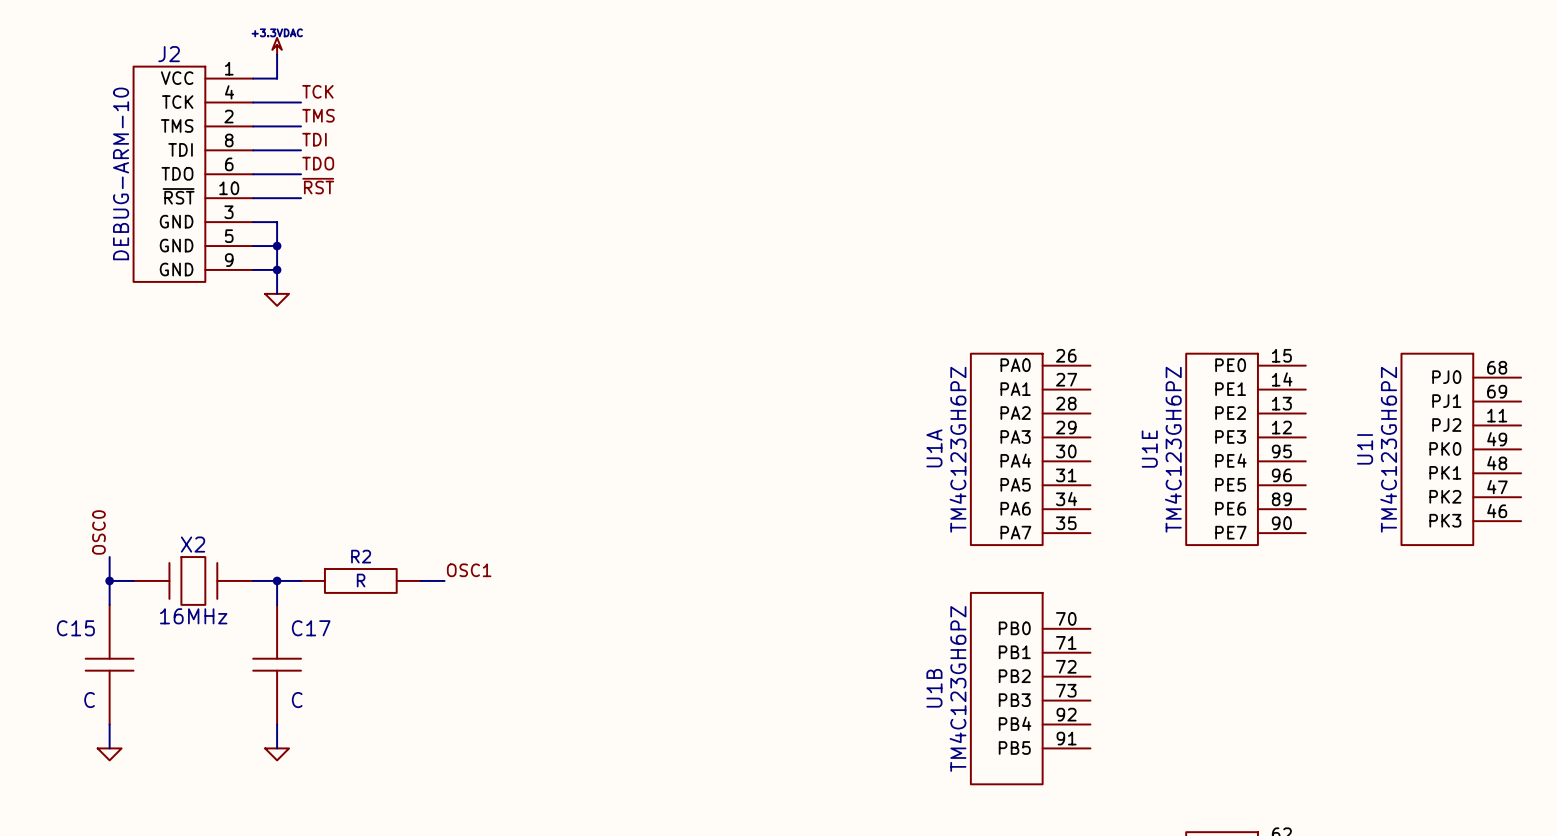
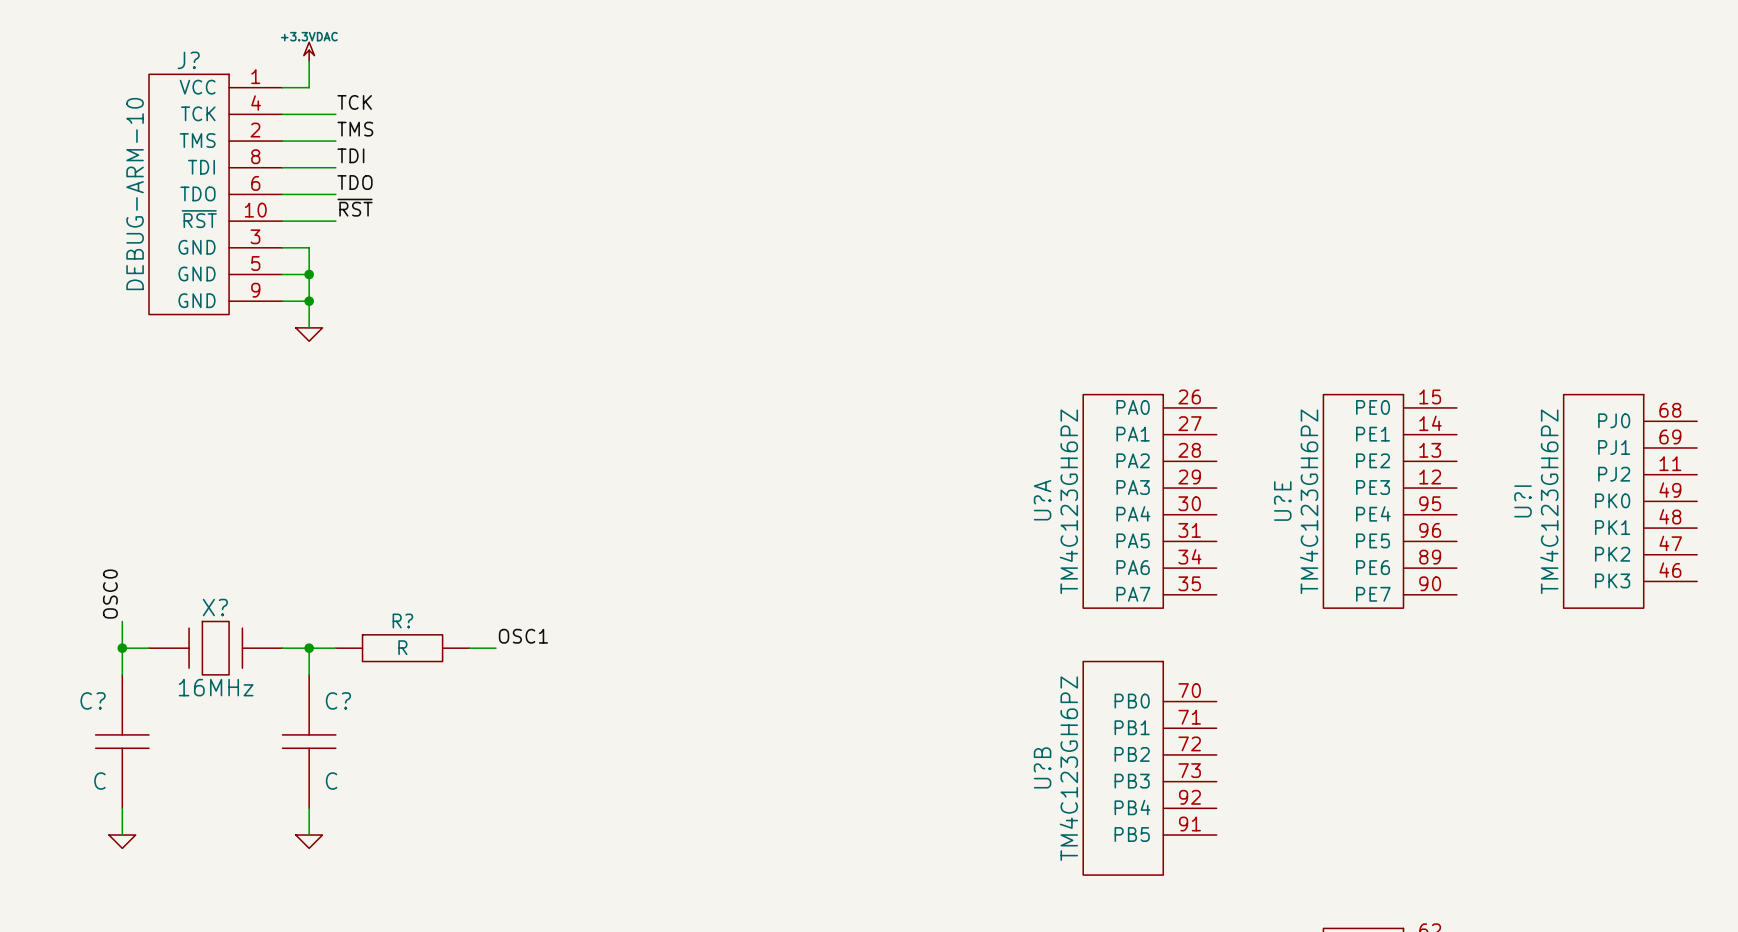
J2 name: J2 (169, 54) -> J? (188, 60)
U1A name: U1A (934, 448) -> U?A (1042, 500)
U1E name: U1E (1149, 449) -> U?E (1282, 501)
U1I name: U1I (1365, 449) -> U?I (1523, 501)
X2 name: X2 (193, 544) -> X? (215, 607)
R2 name: R2 (361, 556) -> R? (402, 620)
C15 name: C15 (75, 628) -> C? (93, 700)
C17 name: C17 (311, 628) -> C? (338, 700)
U1B name: U1B (934, 688) -> U?B (1042, 767)

